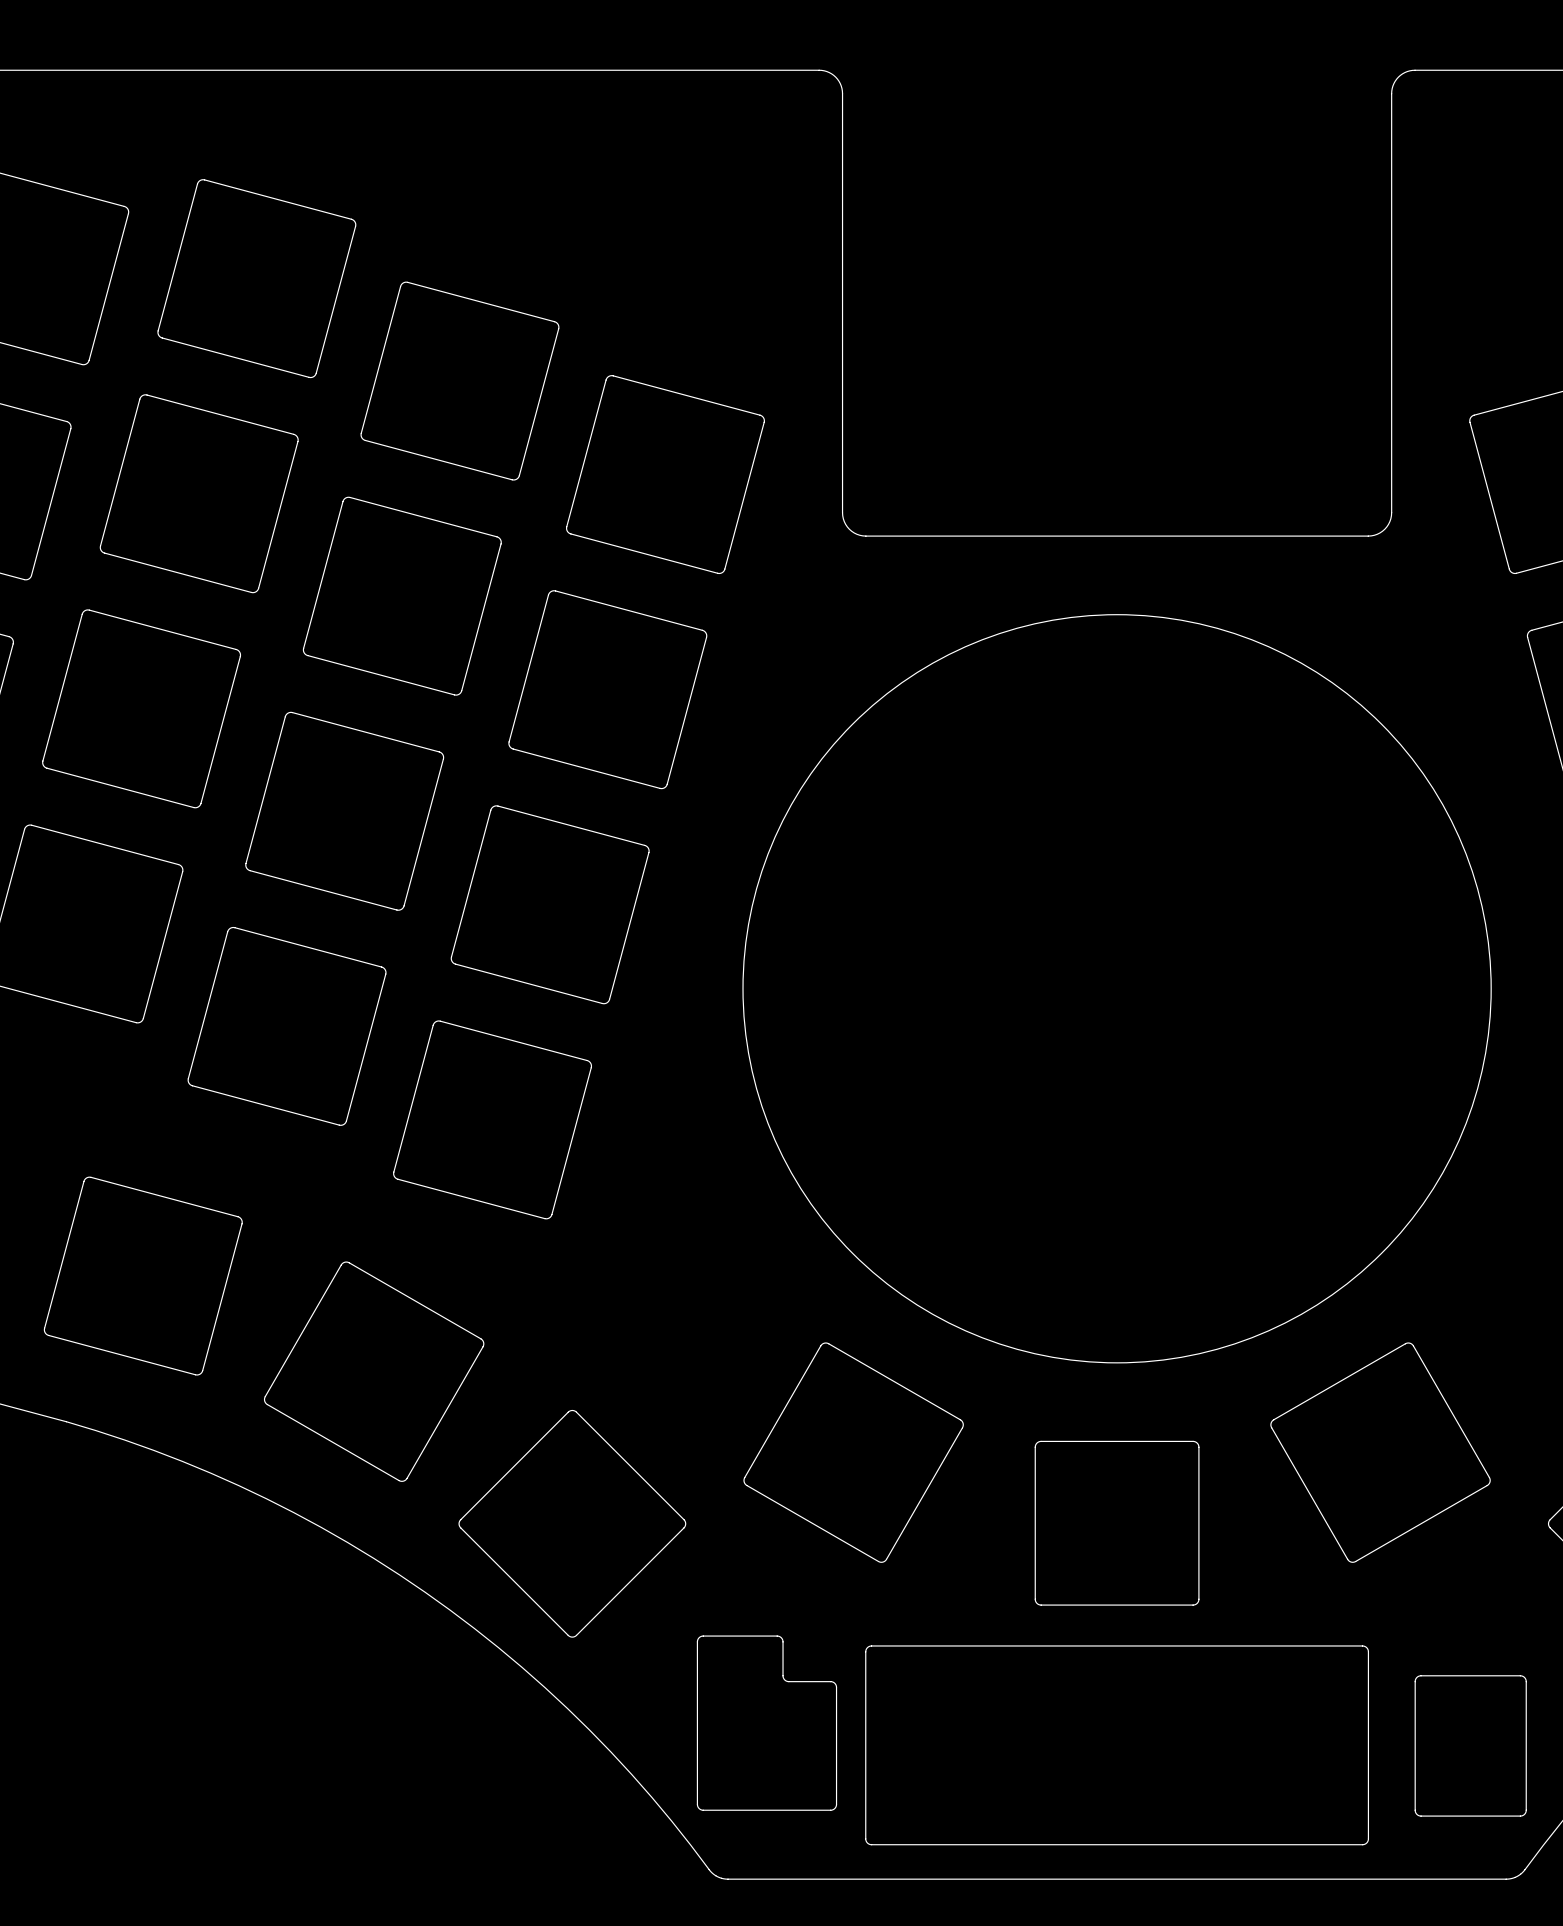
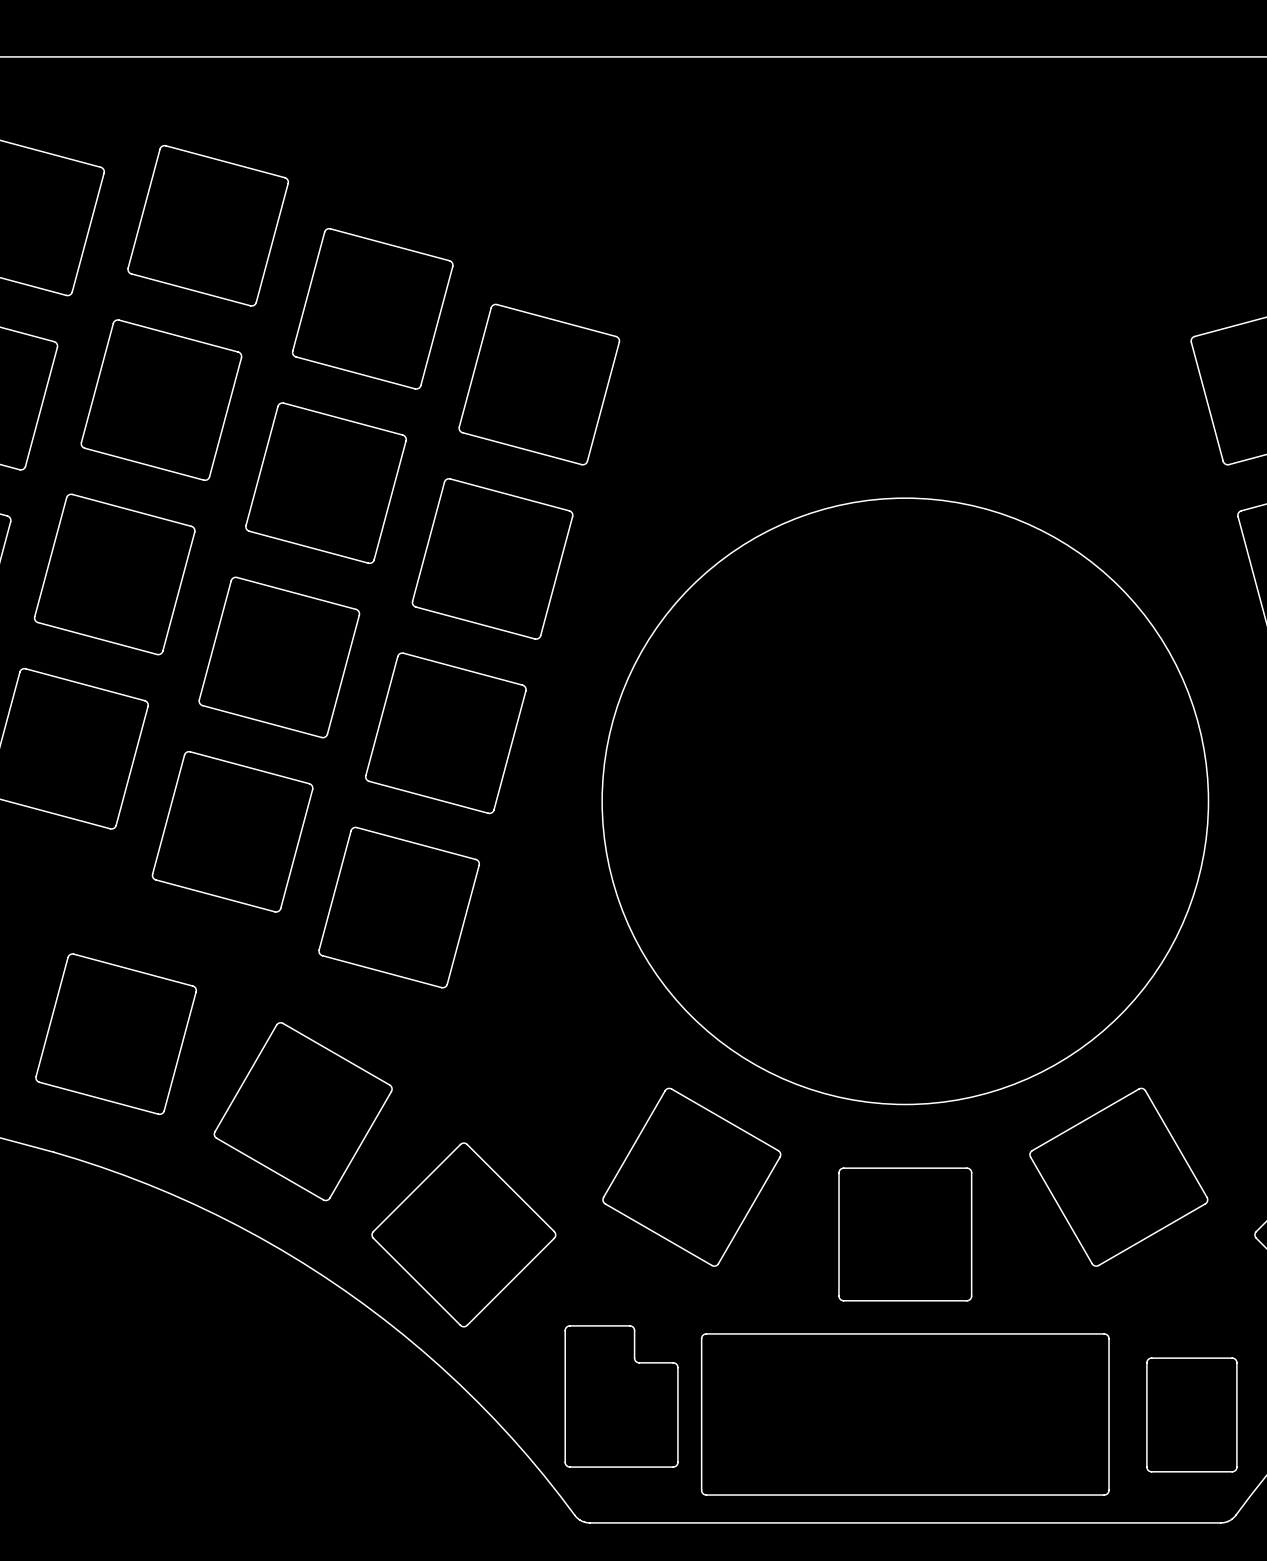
board edge: (1415, 70) (1407, 71) (1398, 77) (1391, 91) (1391, 512) (1389, 521) (1384, 529) (1377, 534) (1368, 536) (865, 536) (851, 531) (844, 521) (842, 512) (842, 91) (835, 77) (829, 72) (819, 70) -> (1146, 56) (663, 56)

